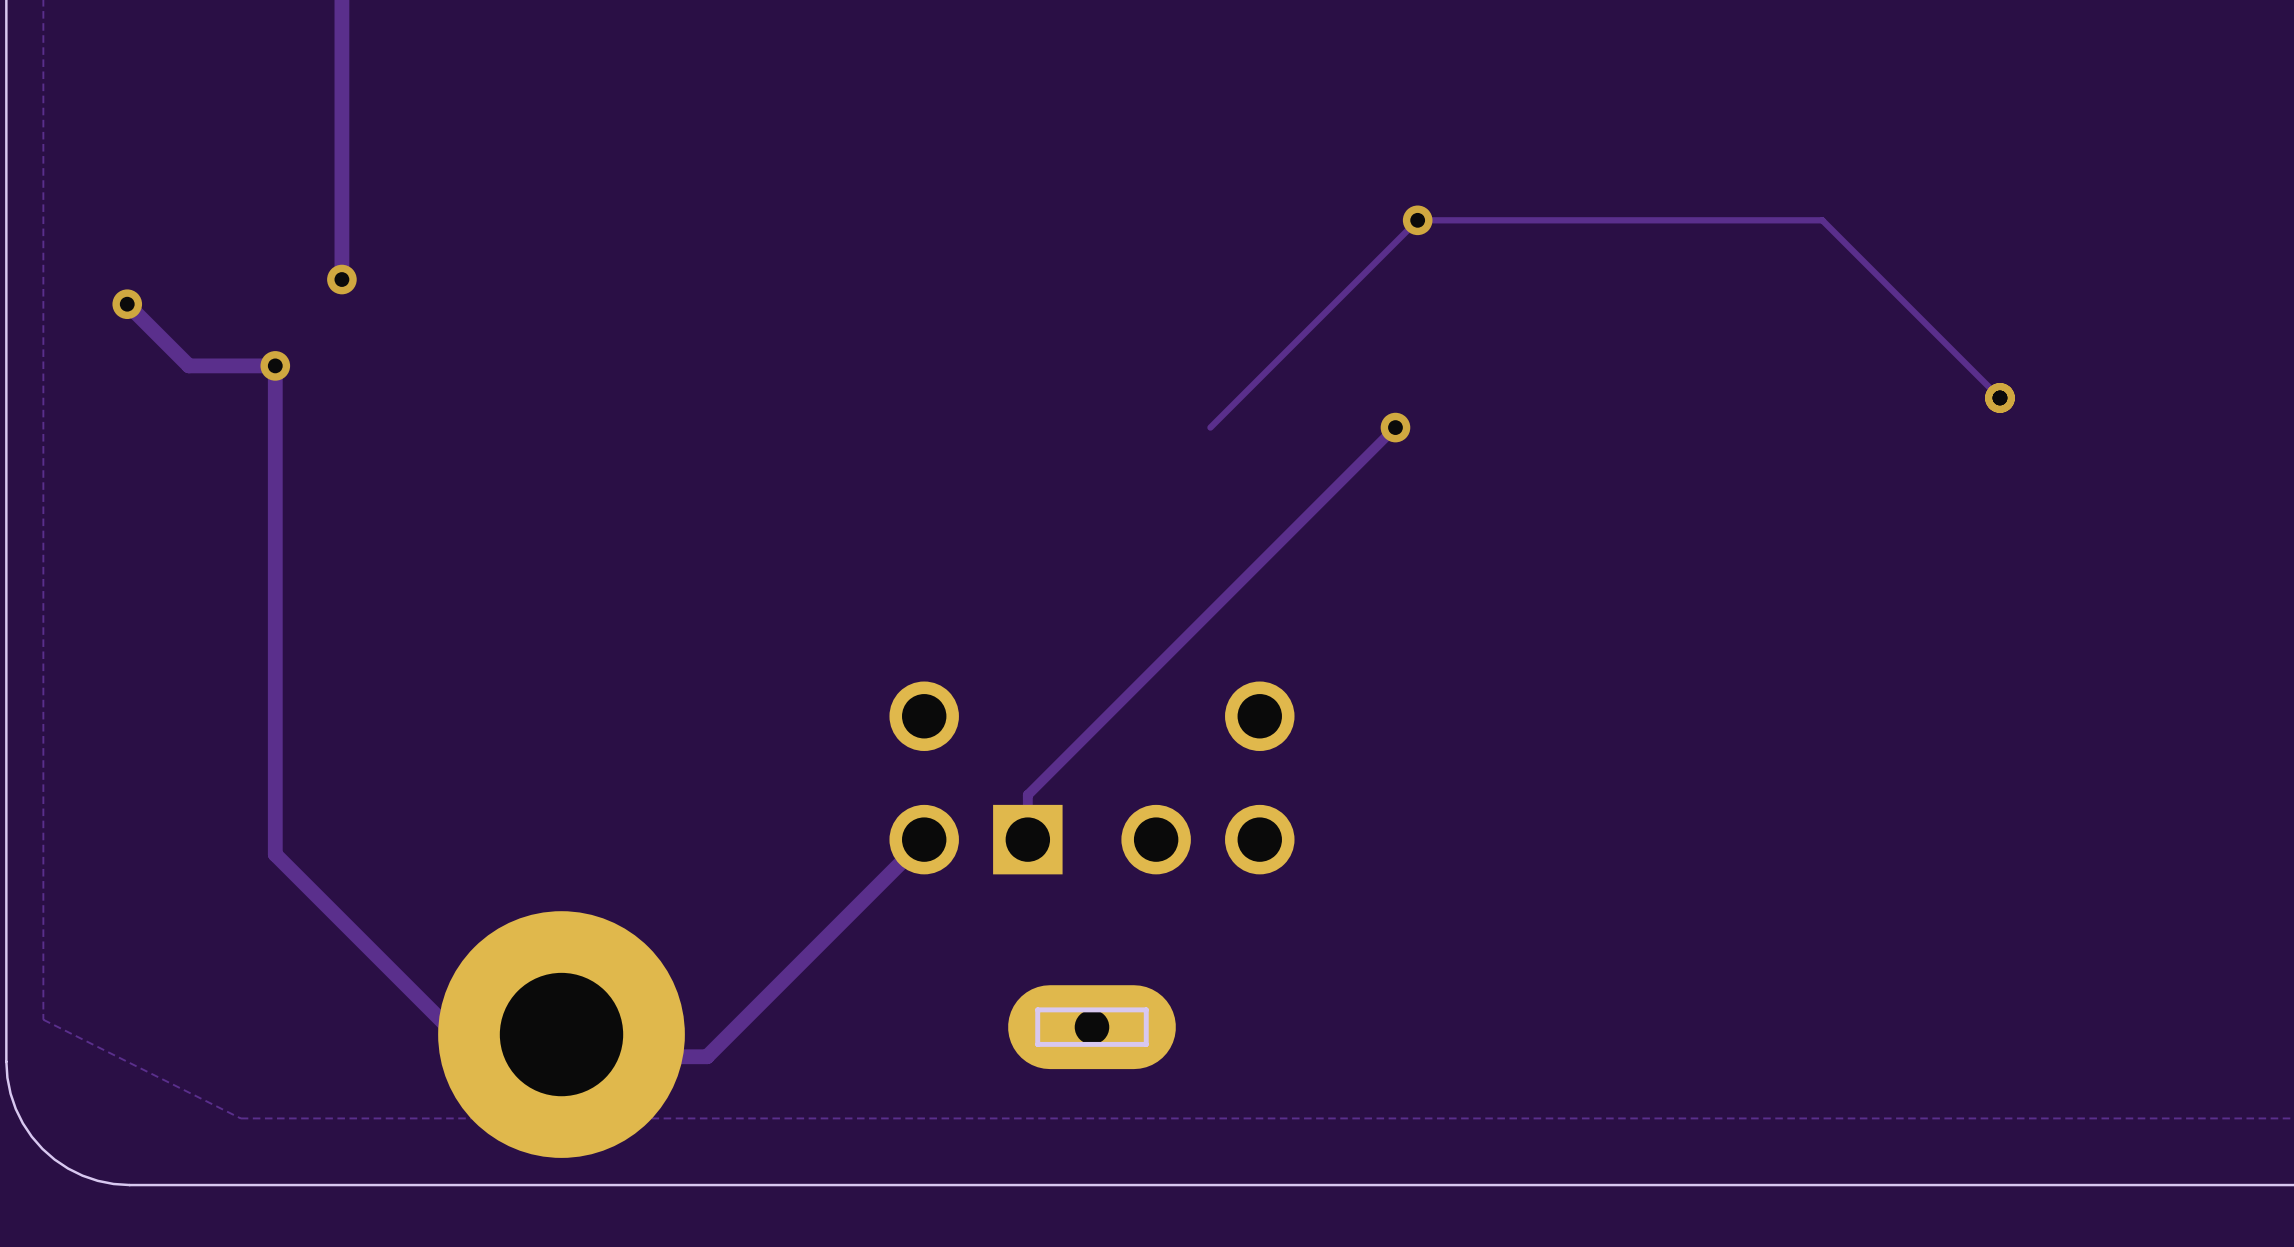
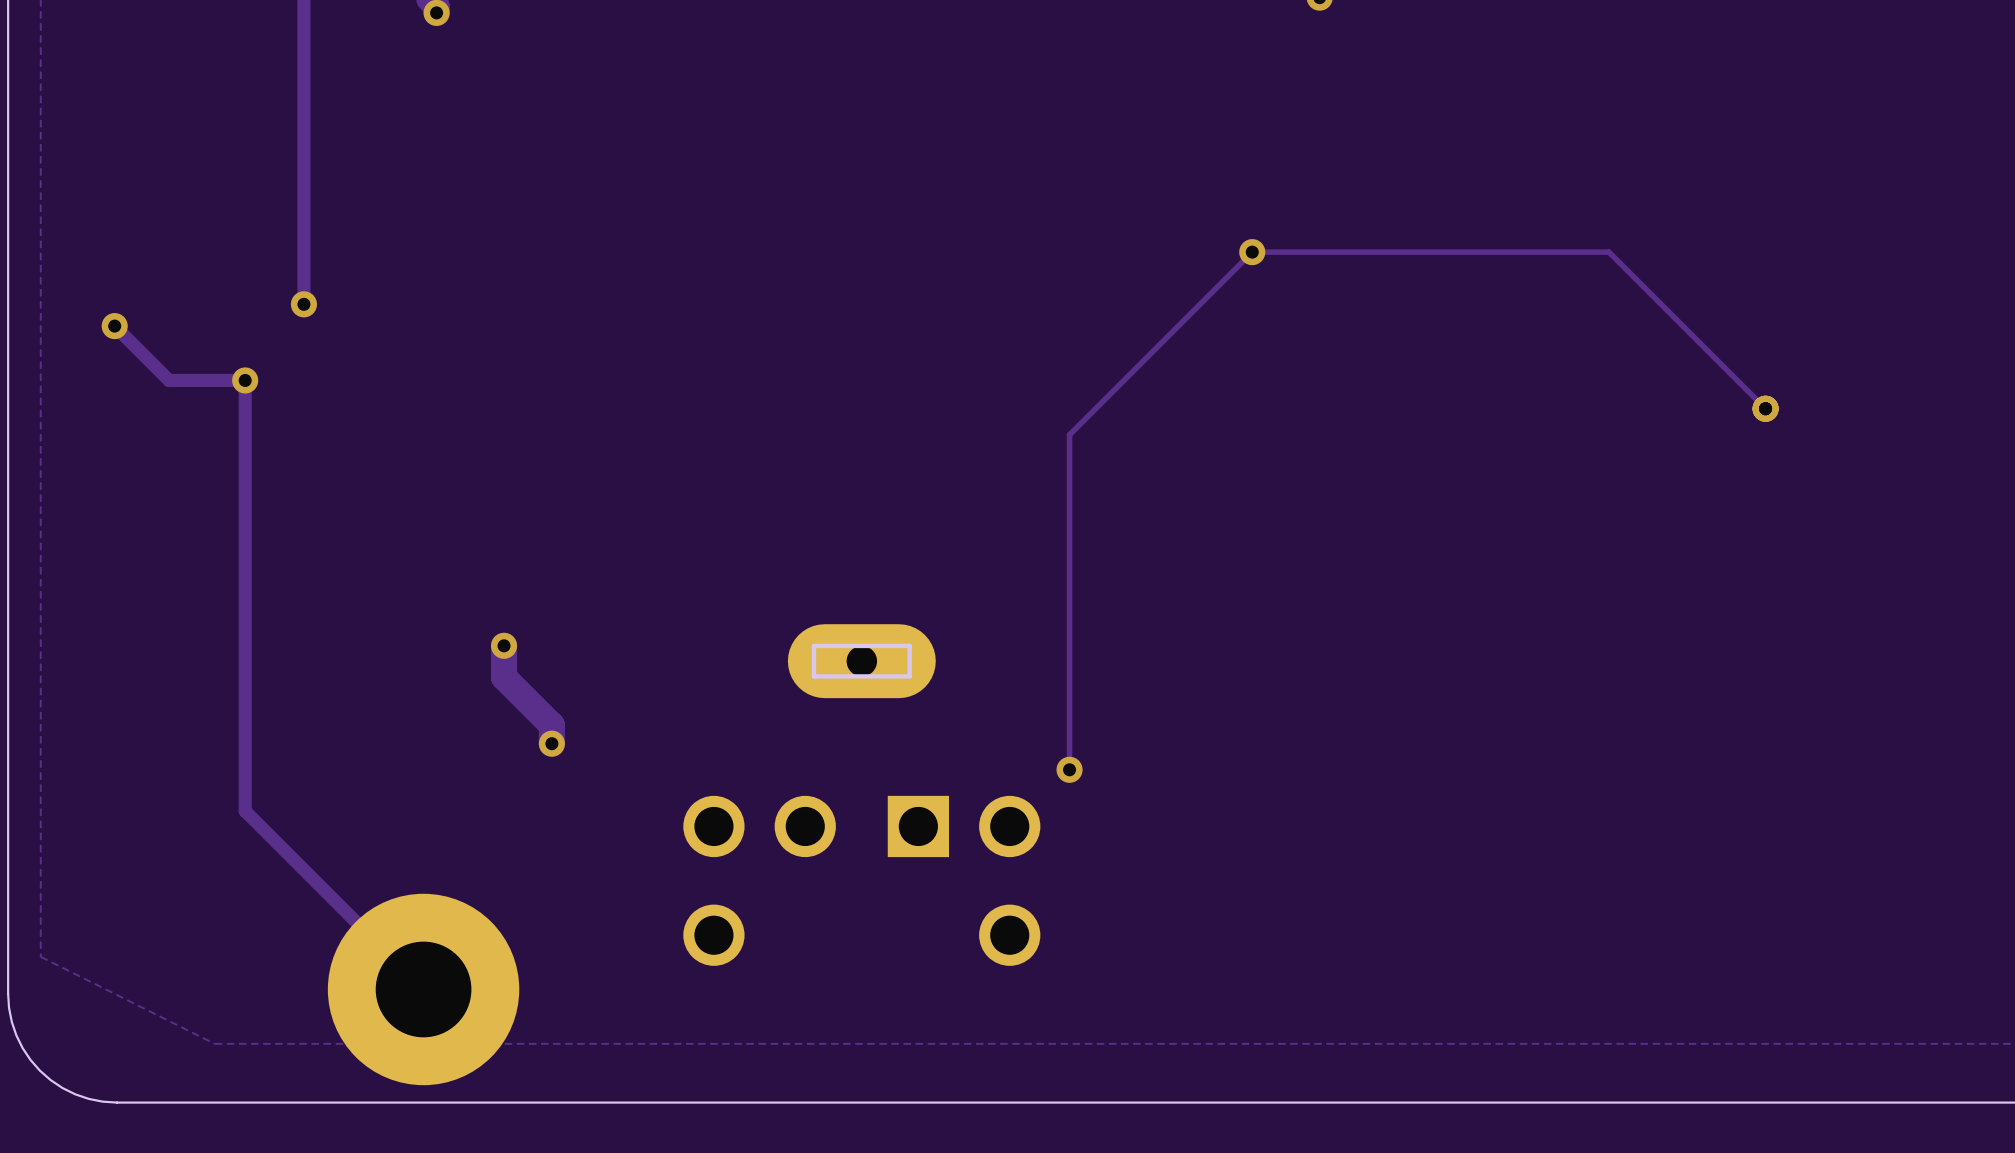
track: none -> (1069, 434) (1069, 769)
track: (1395, 427) (1027, 795) (1027, 839) -> none
via: (1395, 427) -> none
track: none -> (504, 645) (504, 677) (551, 725) (551, 743)
via: none -> (504, 645)
via: none -> (551, 743)
via: none -> (1069, 769)
track: (924, 839) (707, 1056) (477, 1056) -> none
part rotation: 0° (1091, 875) -> 180° (861, 795)
part: (561, 1034) -> none
part: none -> (423, 989)

